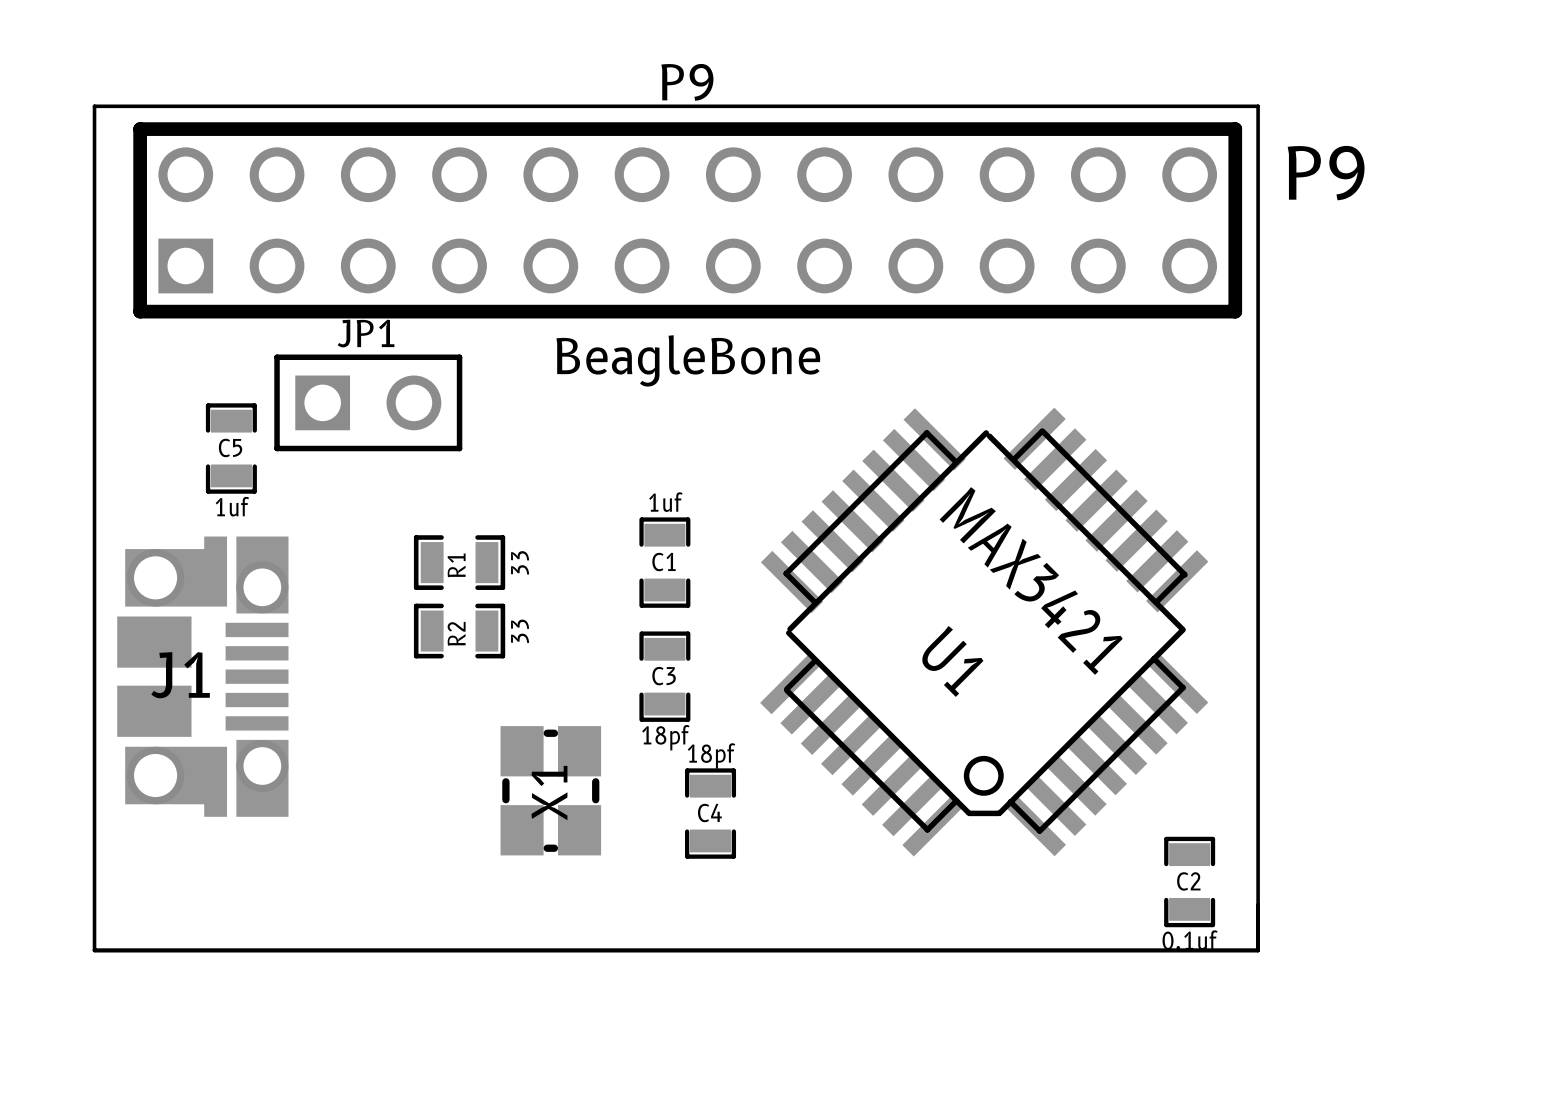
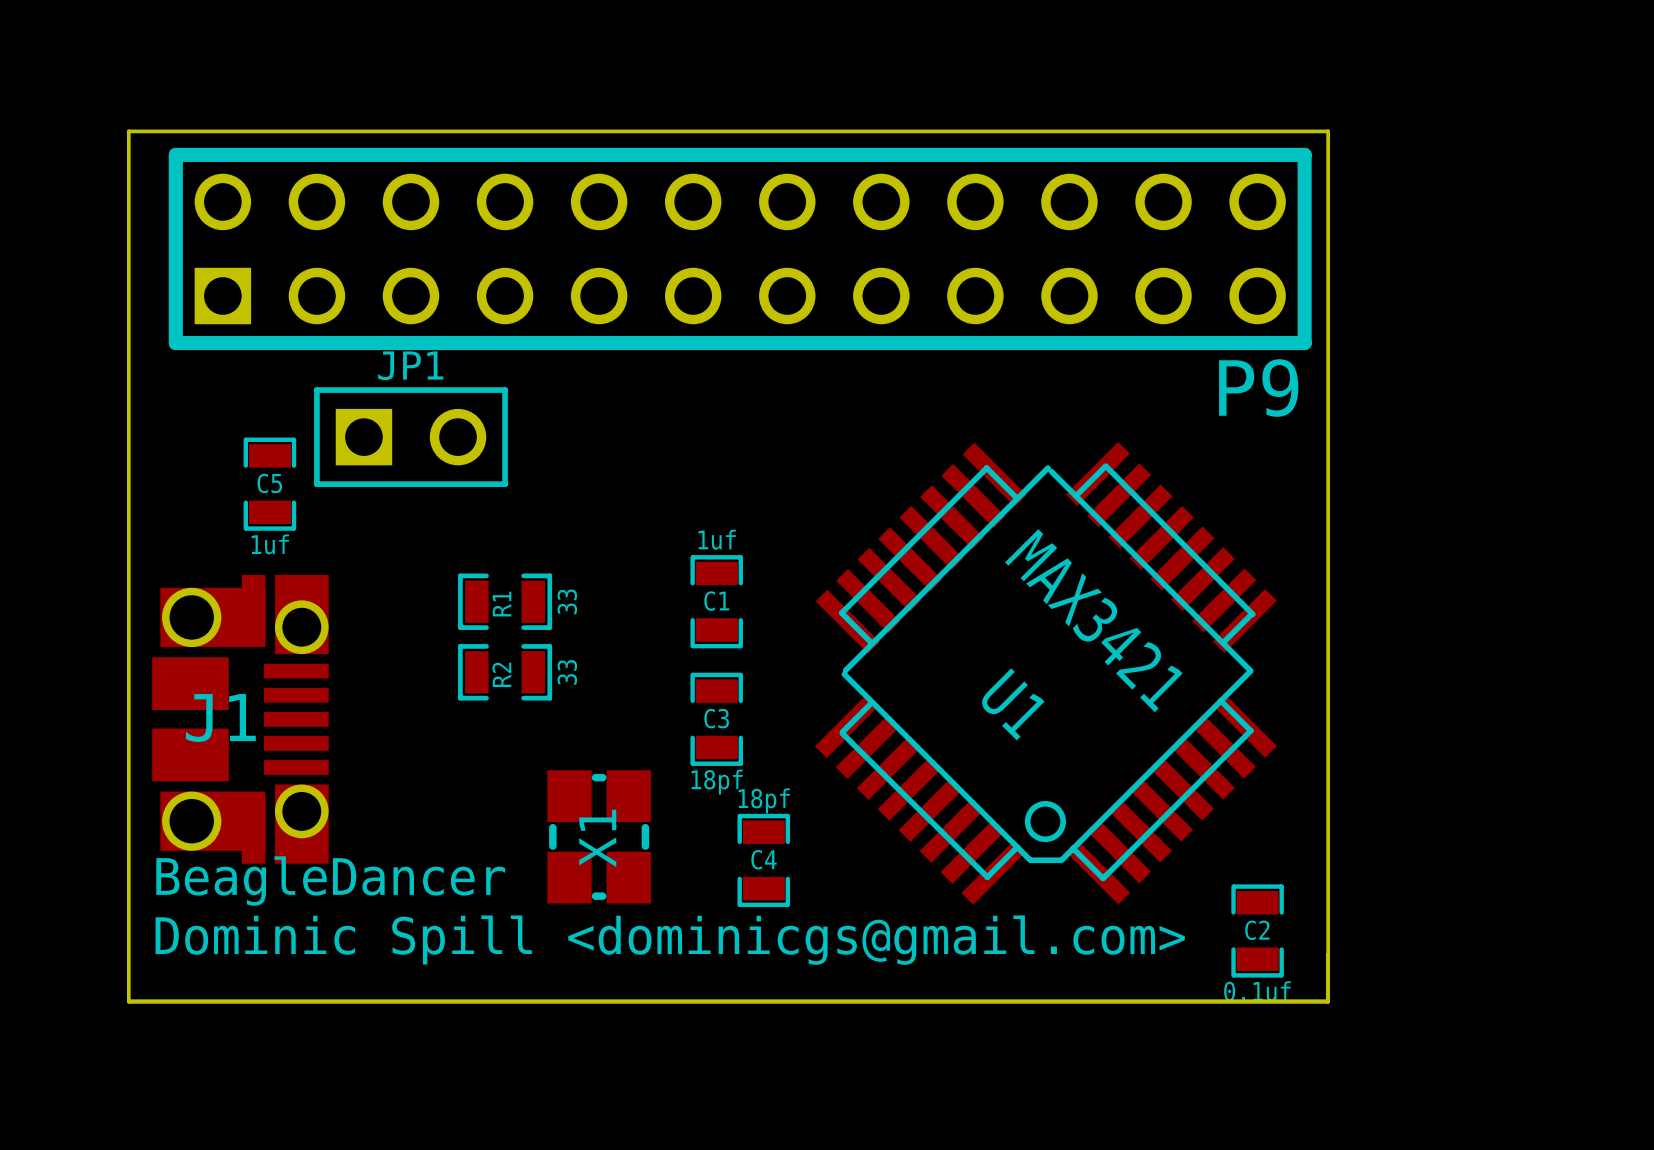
P9 name: P9 (687, 82) -> none
text position: P9 (1326, 173) -> P9 (1258, 388)
P9 value: BeagleBone (688, 360) -> none
text: none -> BeagleDancer (330, 881)
text: none -> Dominic Spill <dominicgs@gmail.com> (670, 940)

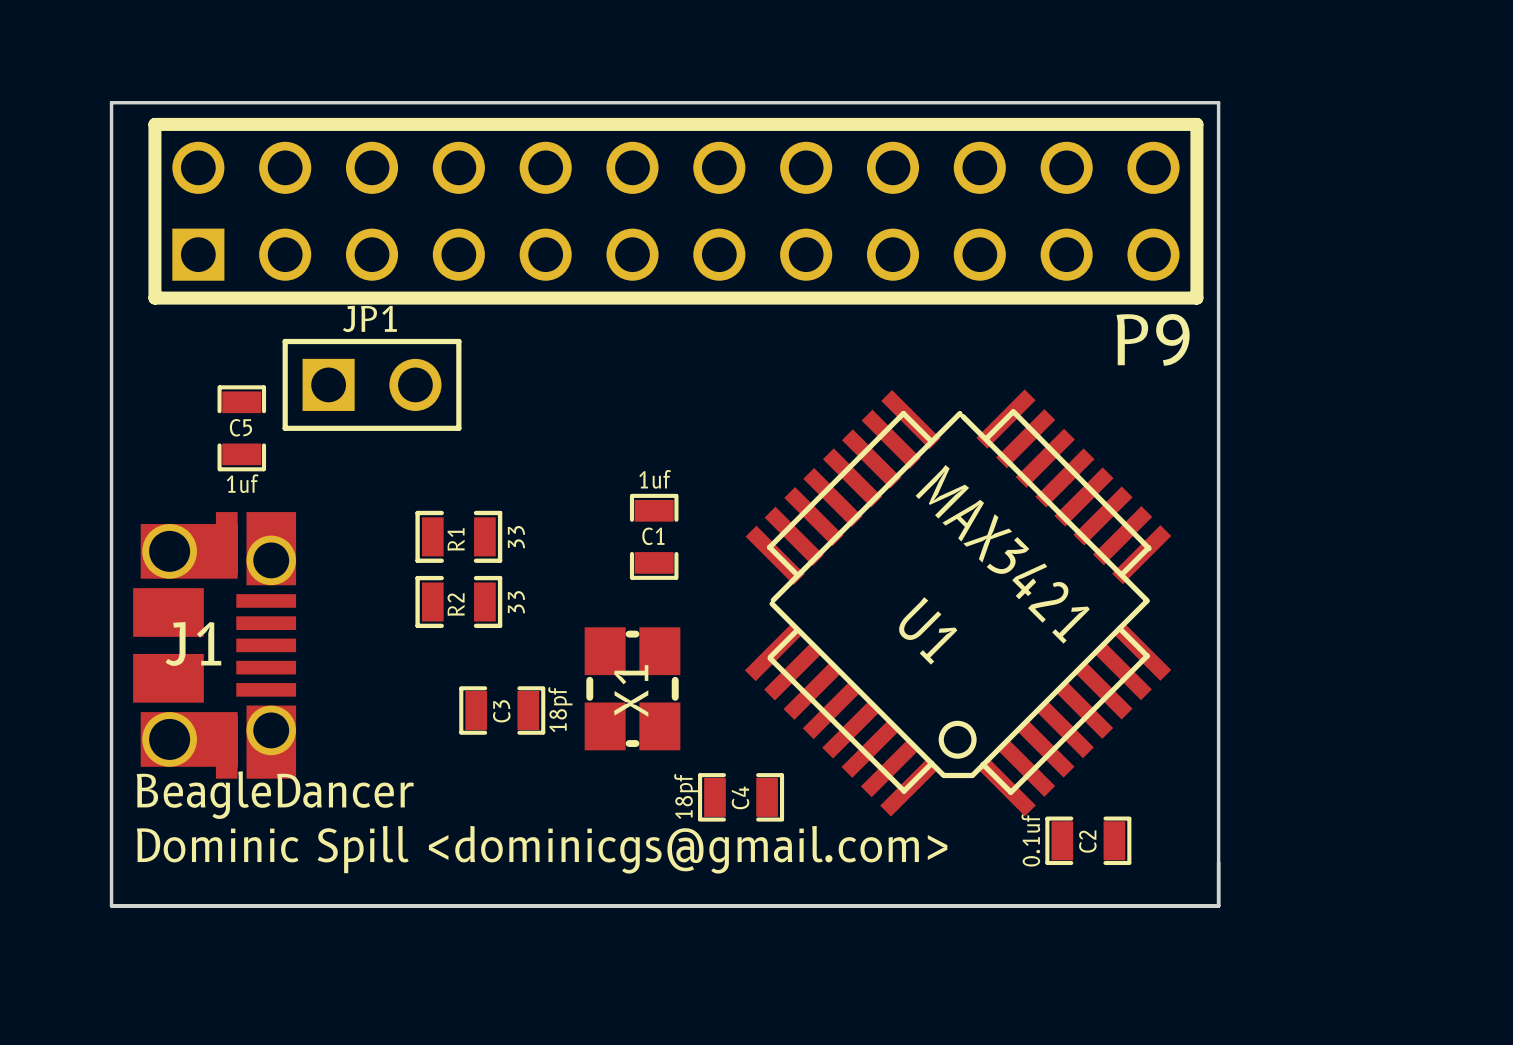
C3 rotation: 0° (716, 719) -> 90° clockwise (502, 710)
C3 position: (716, 719) -> (502, 710)
C3 value position: 18pf (717, 782) -> 18pf (560, 709)
C4 value position: 18pf (764, 800) -> 18pf (686, 796)
X1 position: (599, 836) -> (632, 688)
C4 rotation: 0° (763, 860) -> 90° clockwise (741, 797)
C2 rotation: 0° (1257, 930) -> 90° clockwise (1088, 840)
C2 position: (1257, 930) -> (1088, 840)

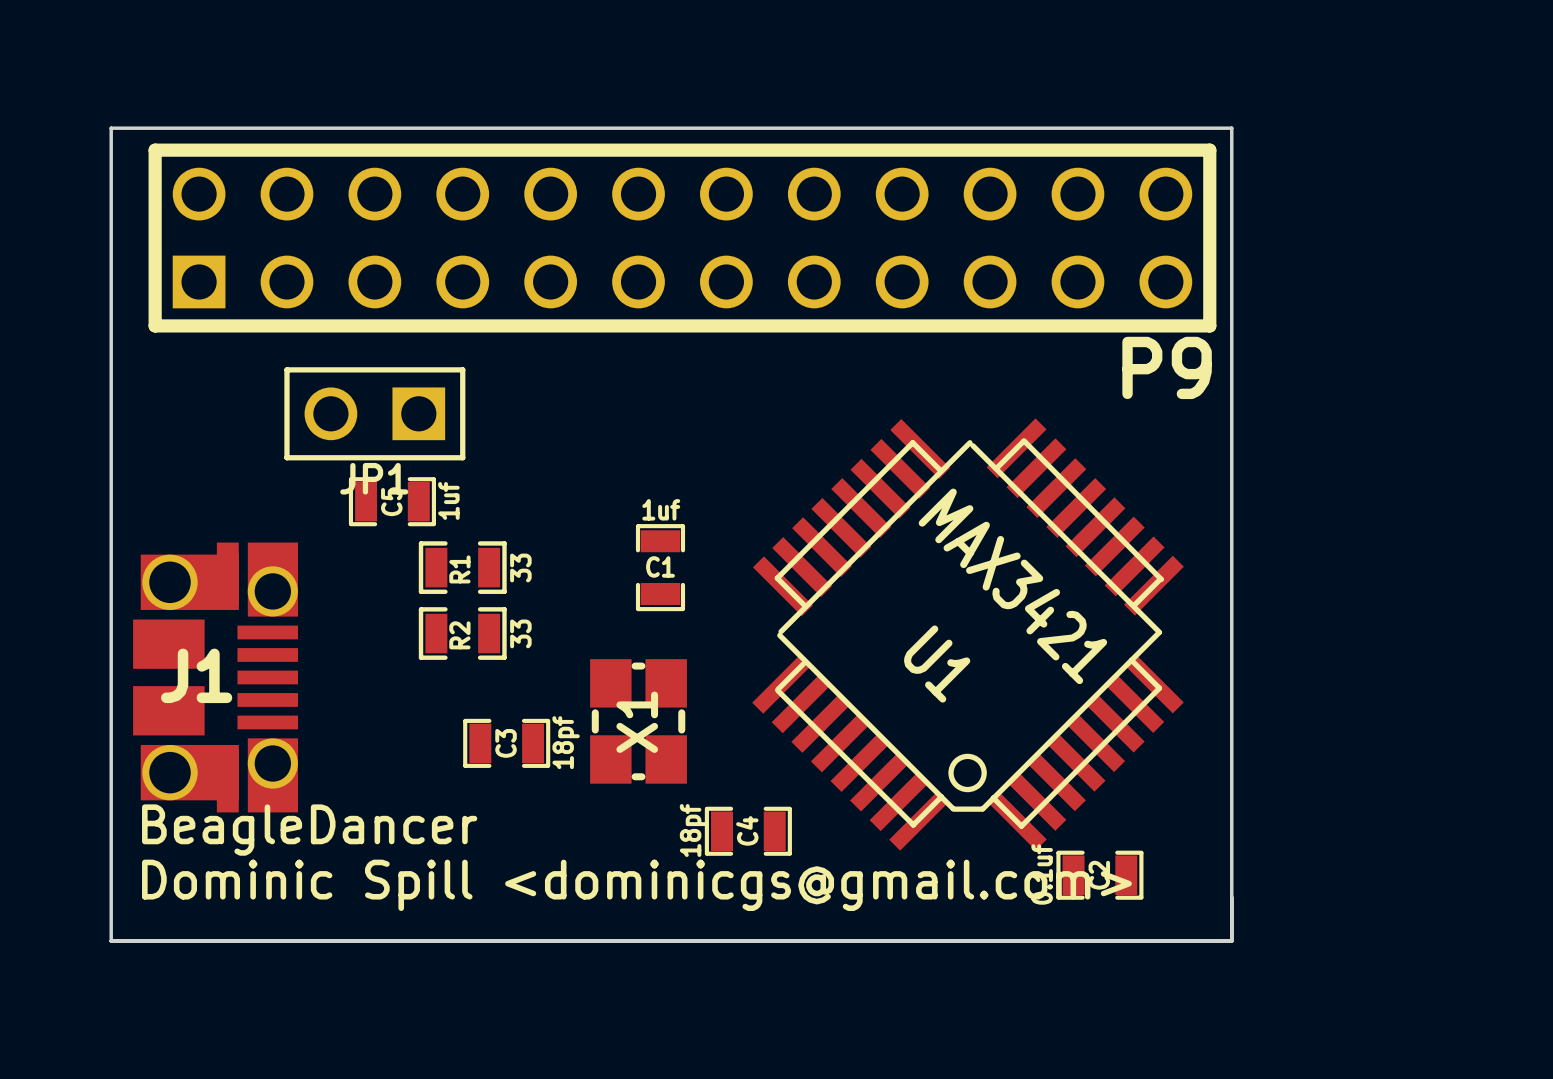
JP1 rotation: 0° (372, 384) -> 180° (374, 413)
C5 rotation: 0° (241, 428) -> 90° clockwise (392, 501)
C5 position: (241, 428) -> (392, 501)
C5 value position: 1uf (242, 483) -> 1uf (448, 500)

